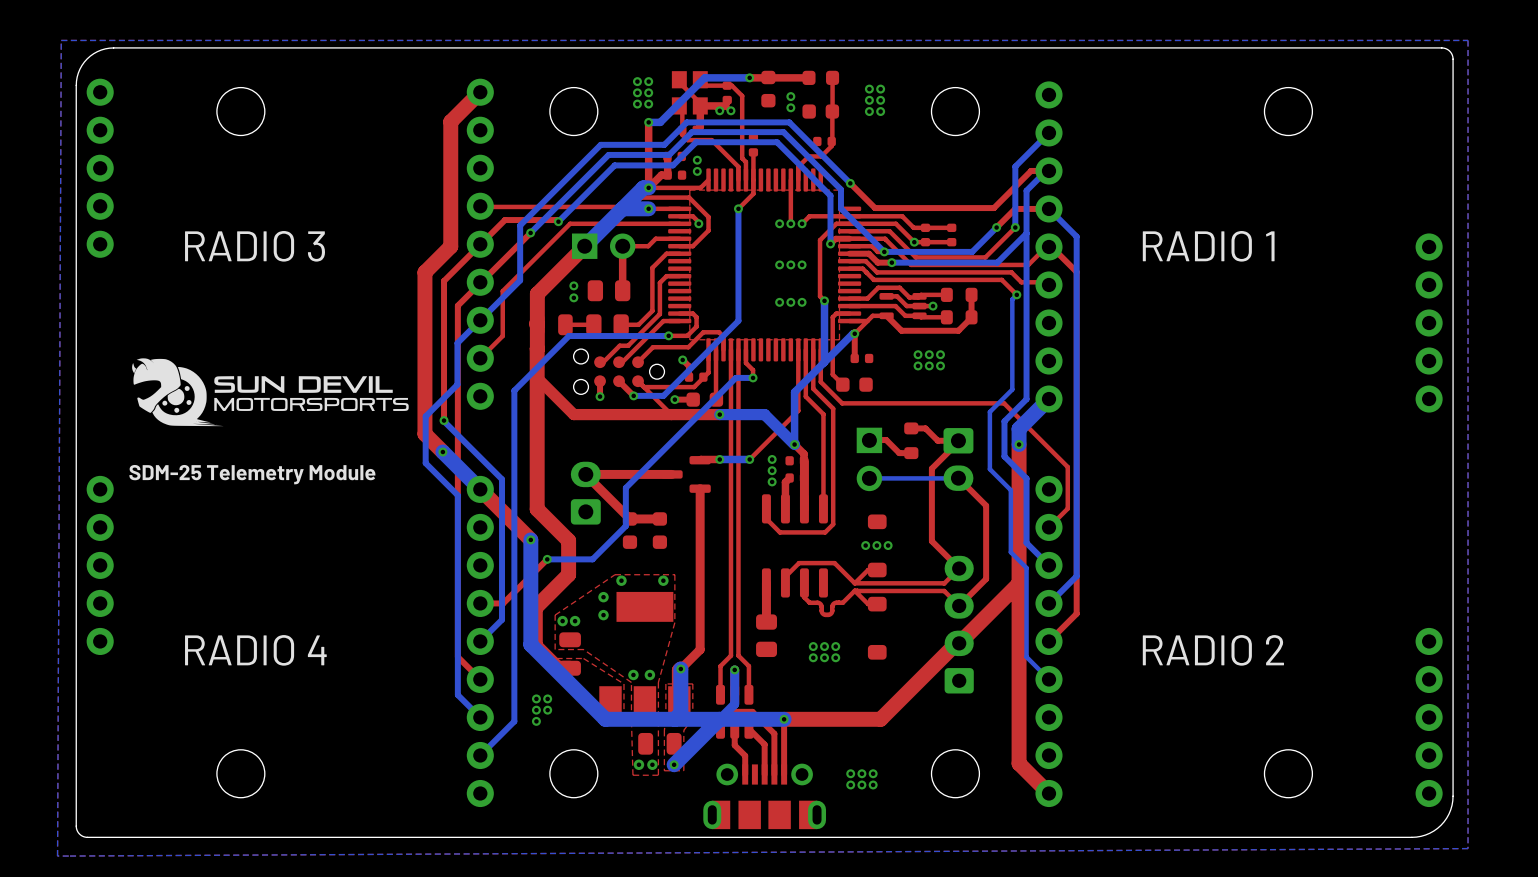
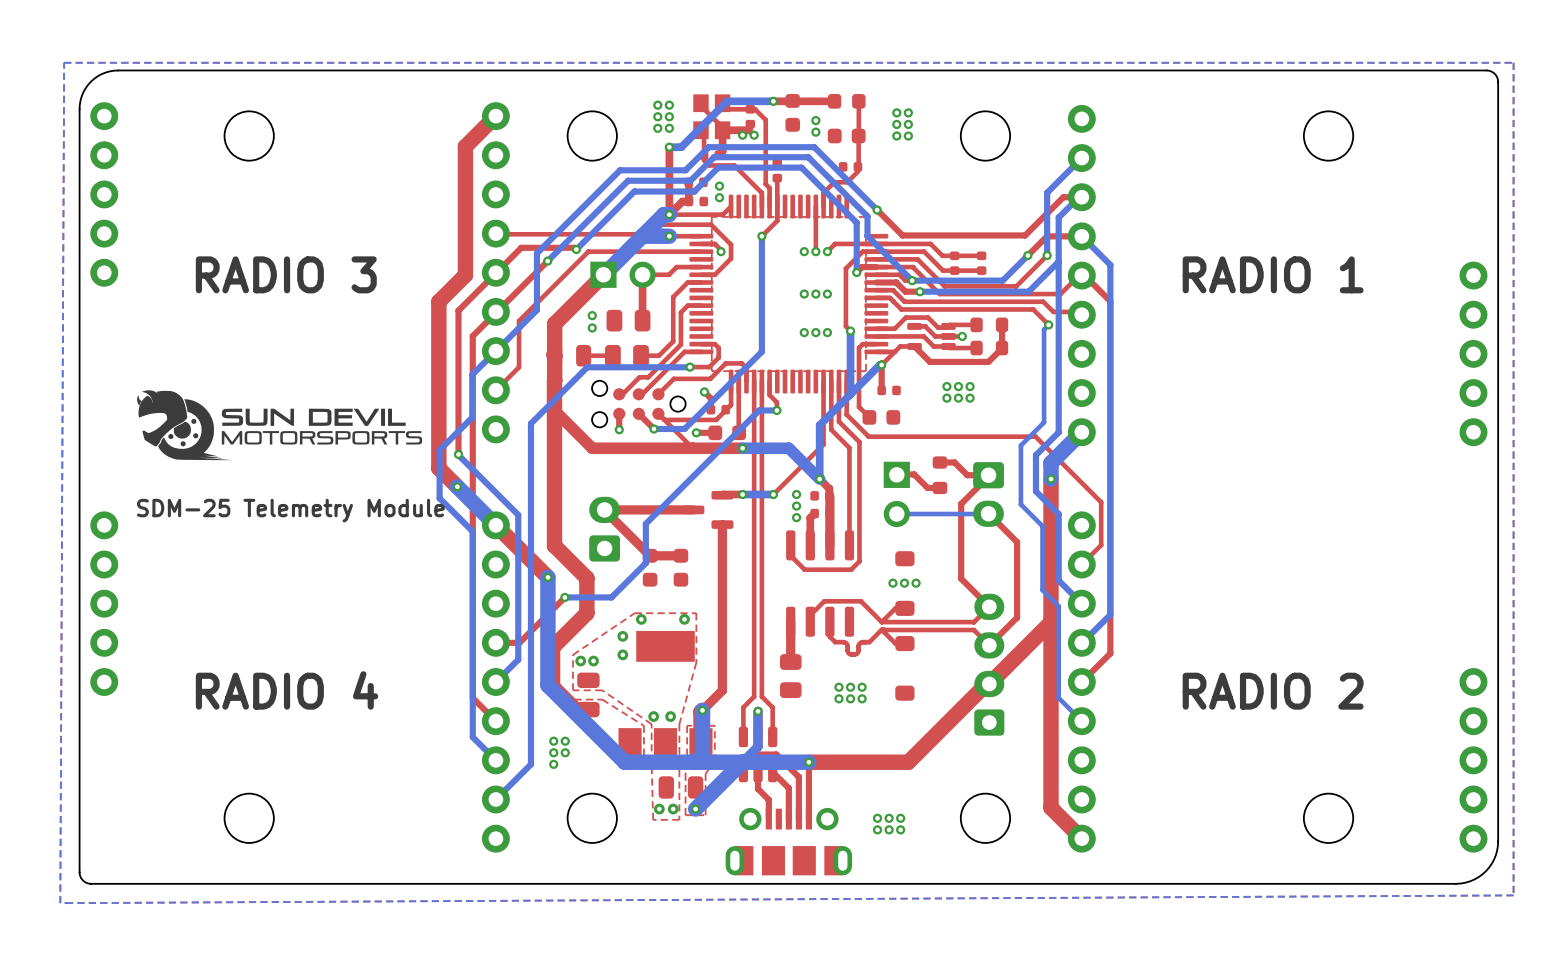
via: (914, 242) -> none

